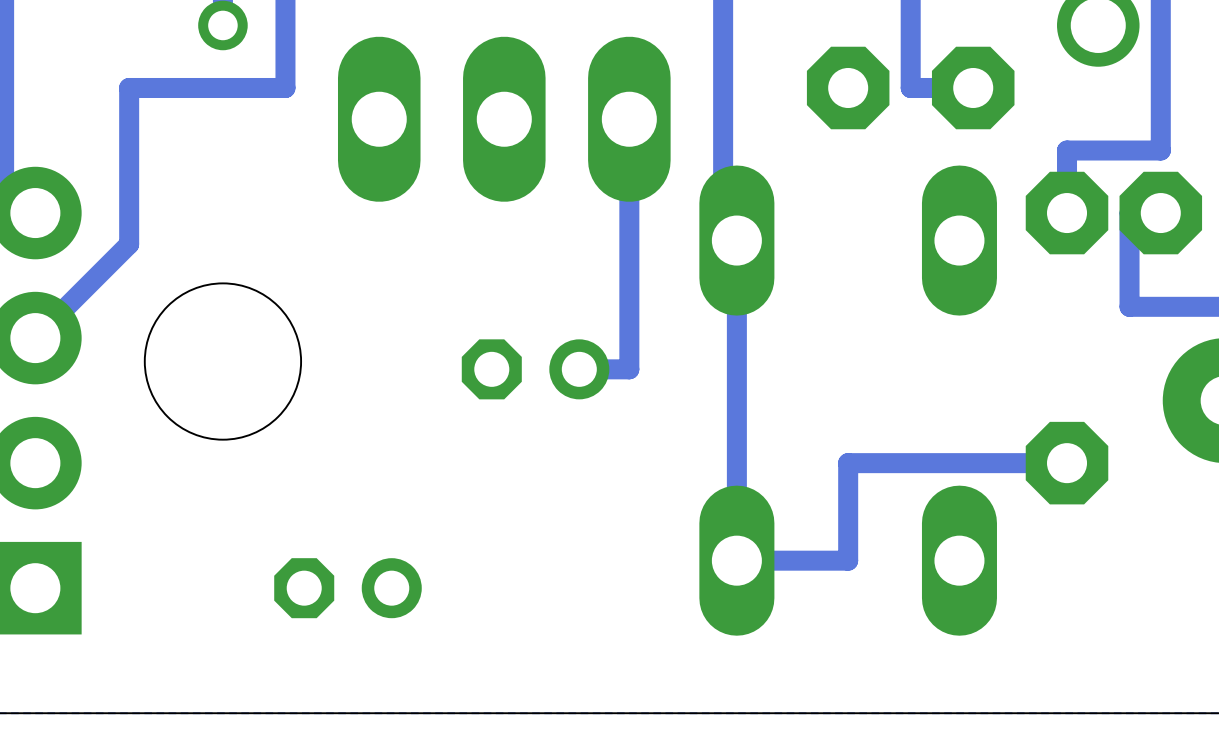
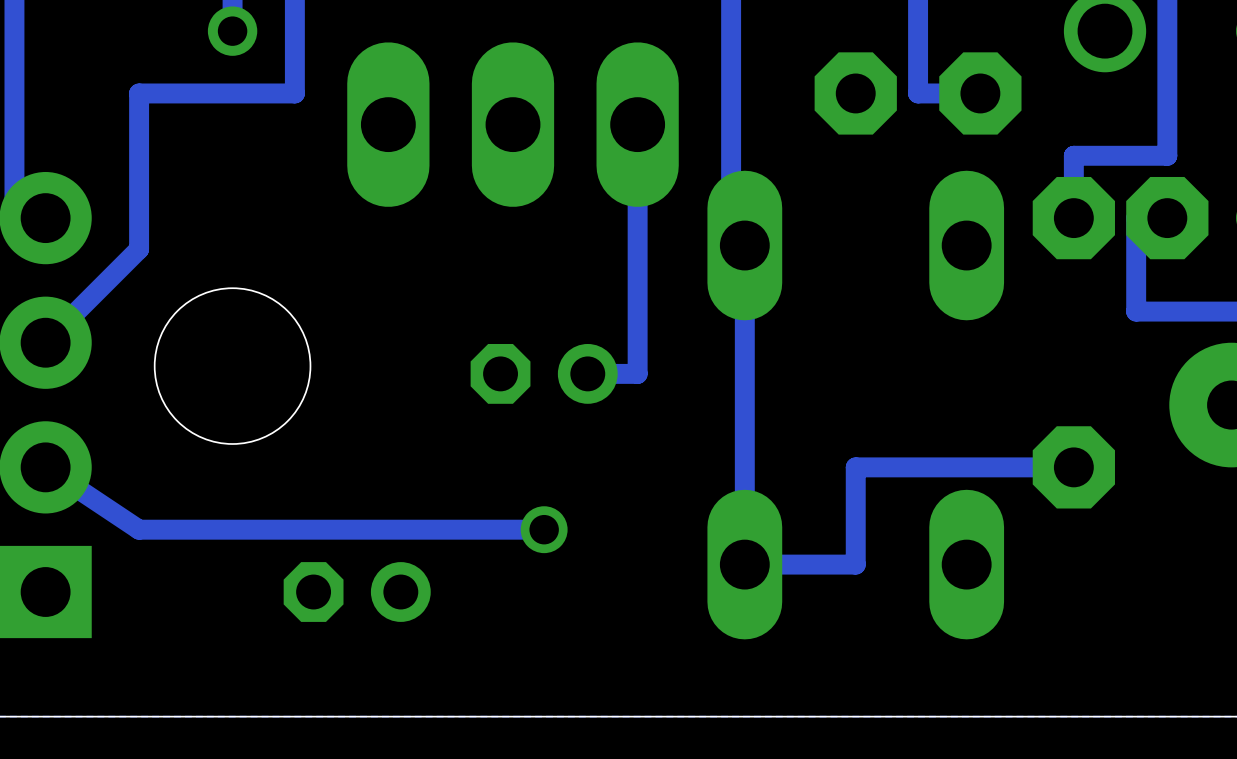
track: none -> (45, 467) (139, 529) (544, 529)
via: none -> (544, 529)

